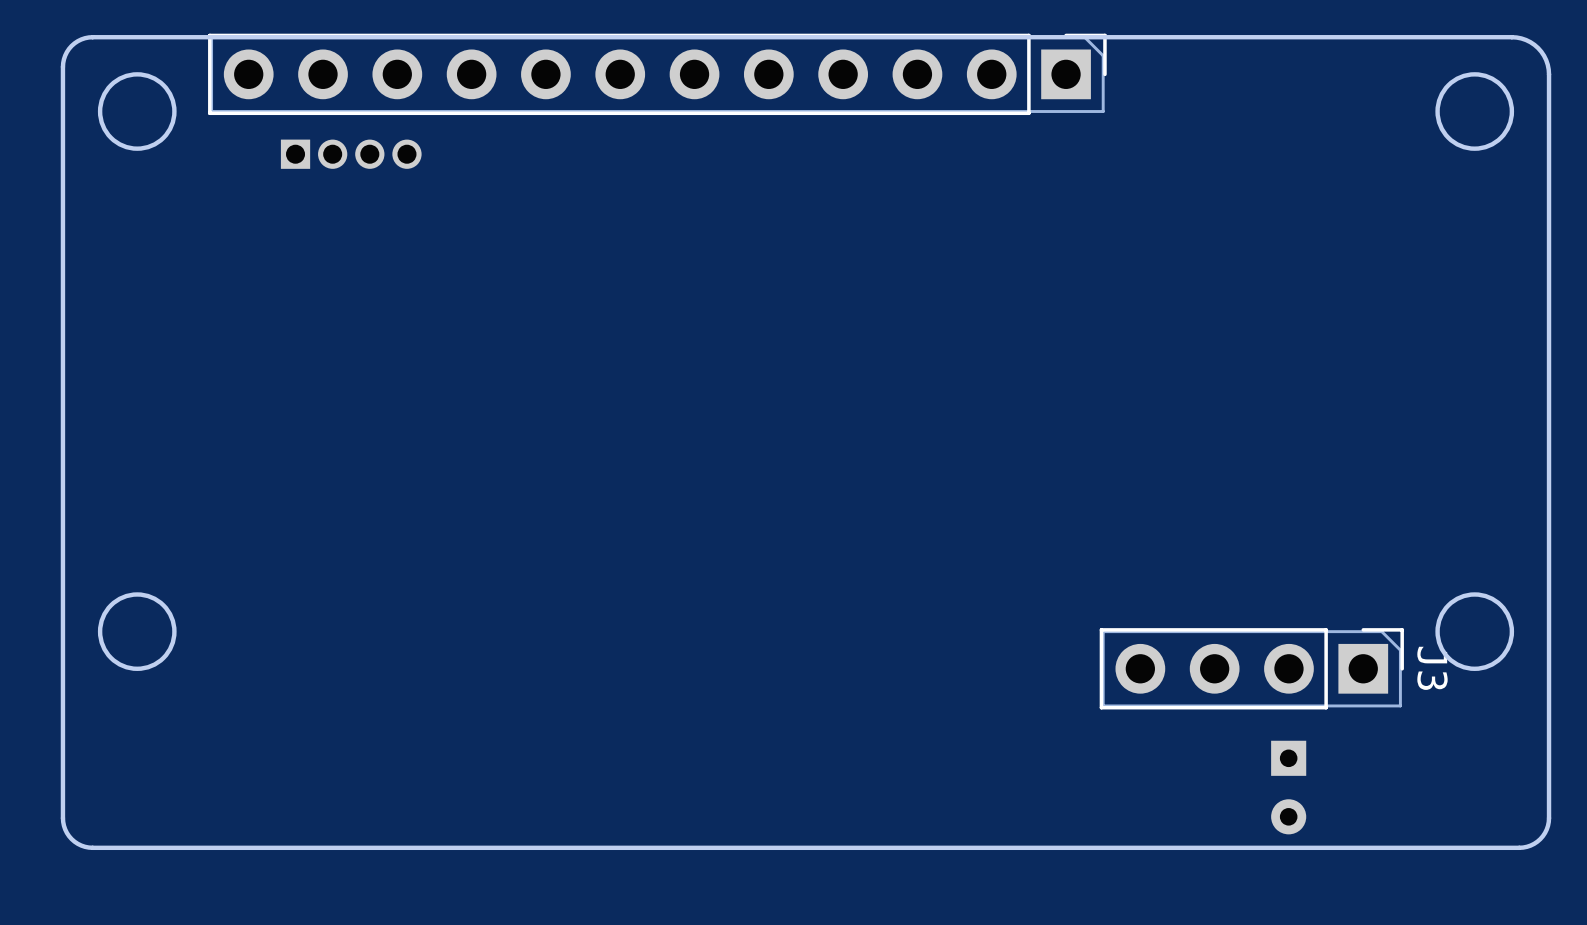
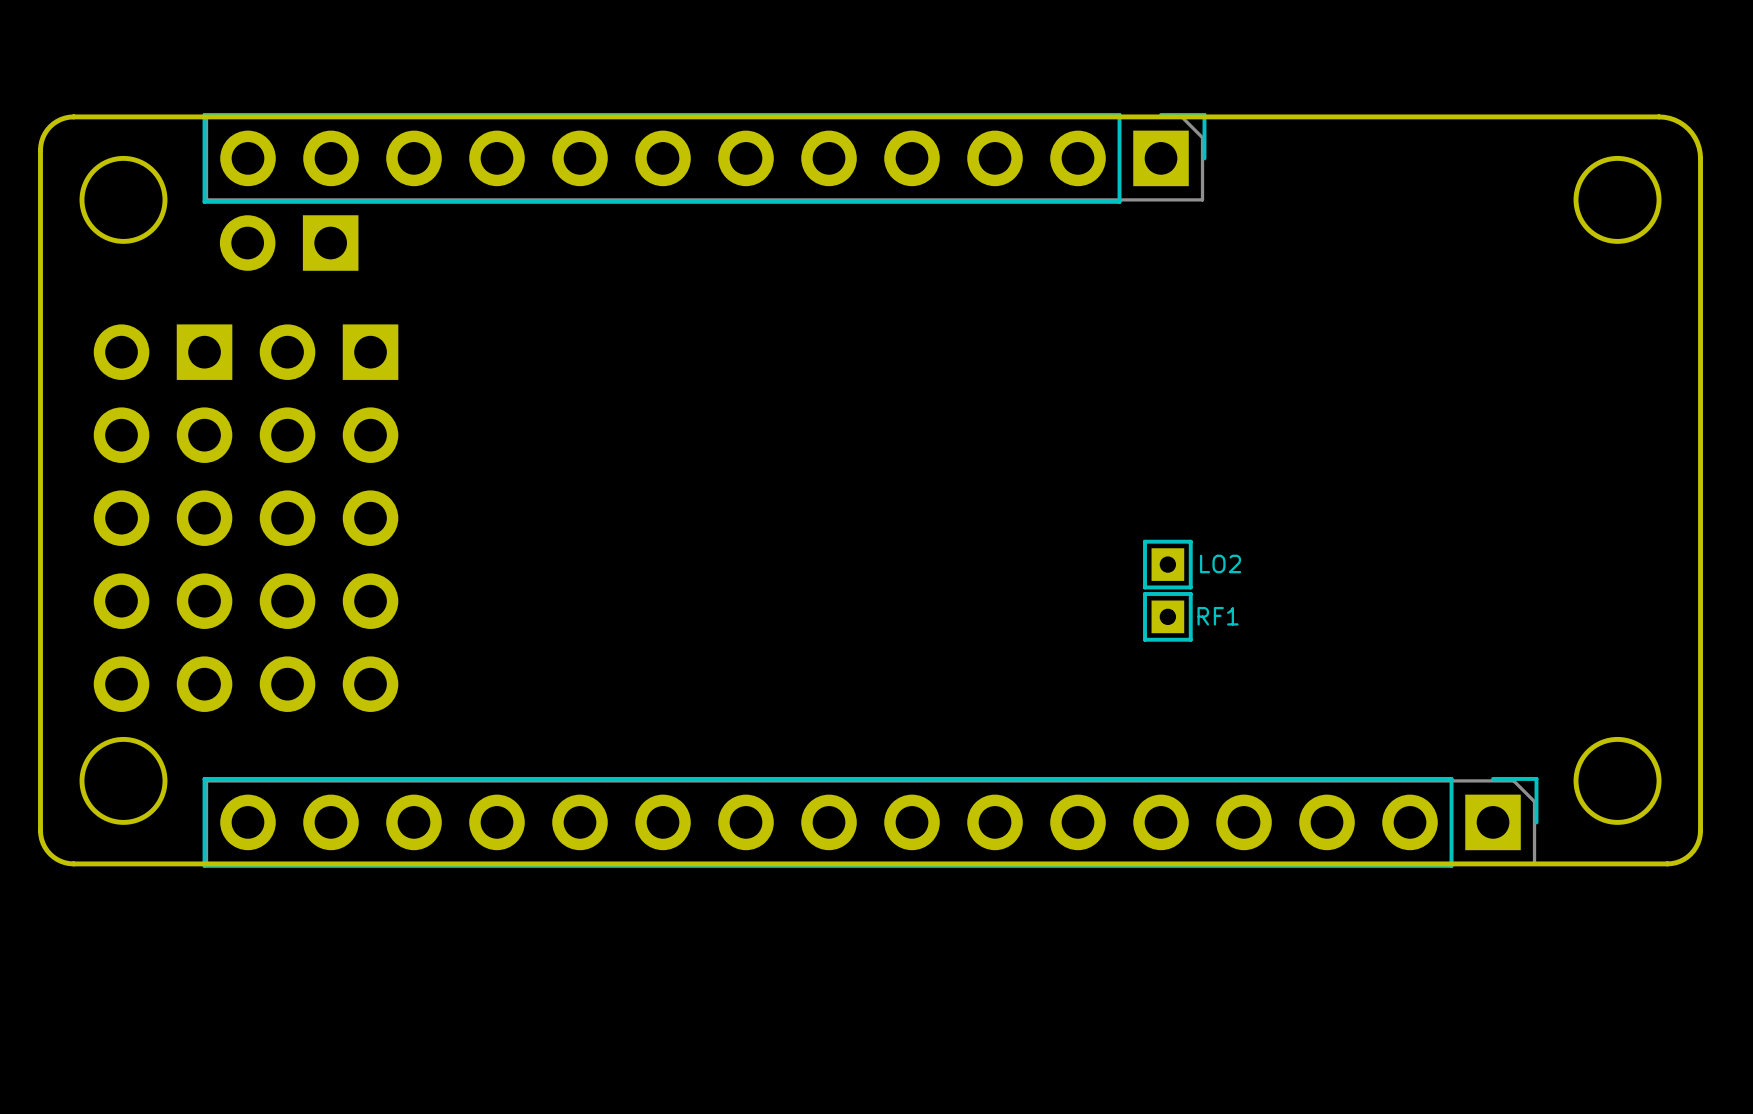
part: none -> (289, 243)
part: (351, 154) -> none
part: none -> (163, 518)
part: none -> (329, 518)
LO2: none -> (1167, 564)
RF1: none -> (1167, 616)
part: none -> (870, 822)
J3: (1251, 668) -> none
board edge: (1549, 676) (1548, 821) (1545, 832) (1537, 841) (1530, 845) (1519, 847) (88, 847) (81, 845) (71, 839) (66, 832) (63, 821) (62, 676) -> (1700, 830) (1697, 843) (1690, 854) (1680, 861) (1667, 863) (73, 863) (60, 861) (50, 854) (43, 843) (40, 830)
part: (1288, 787) -> none

